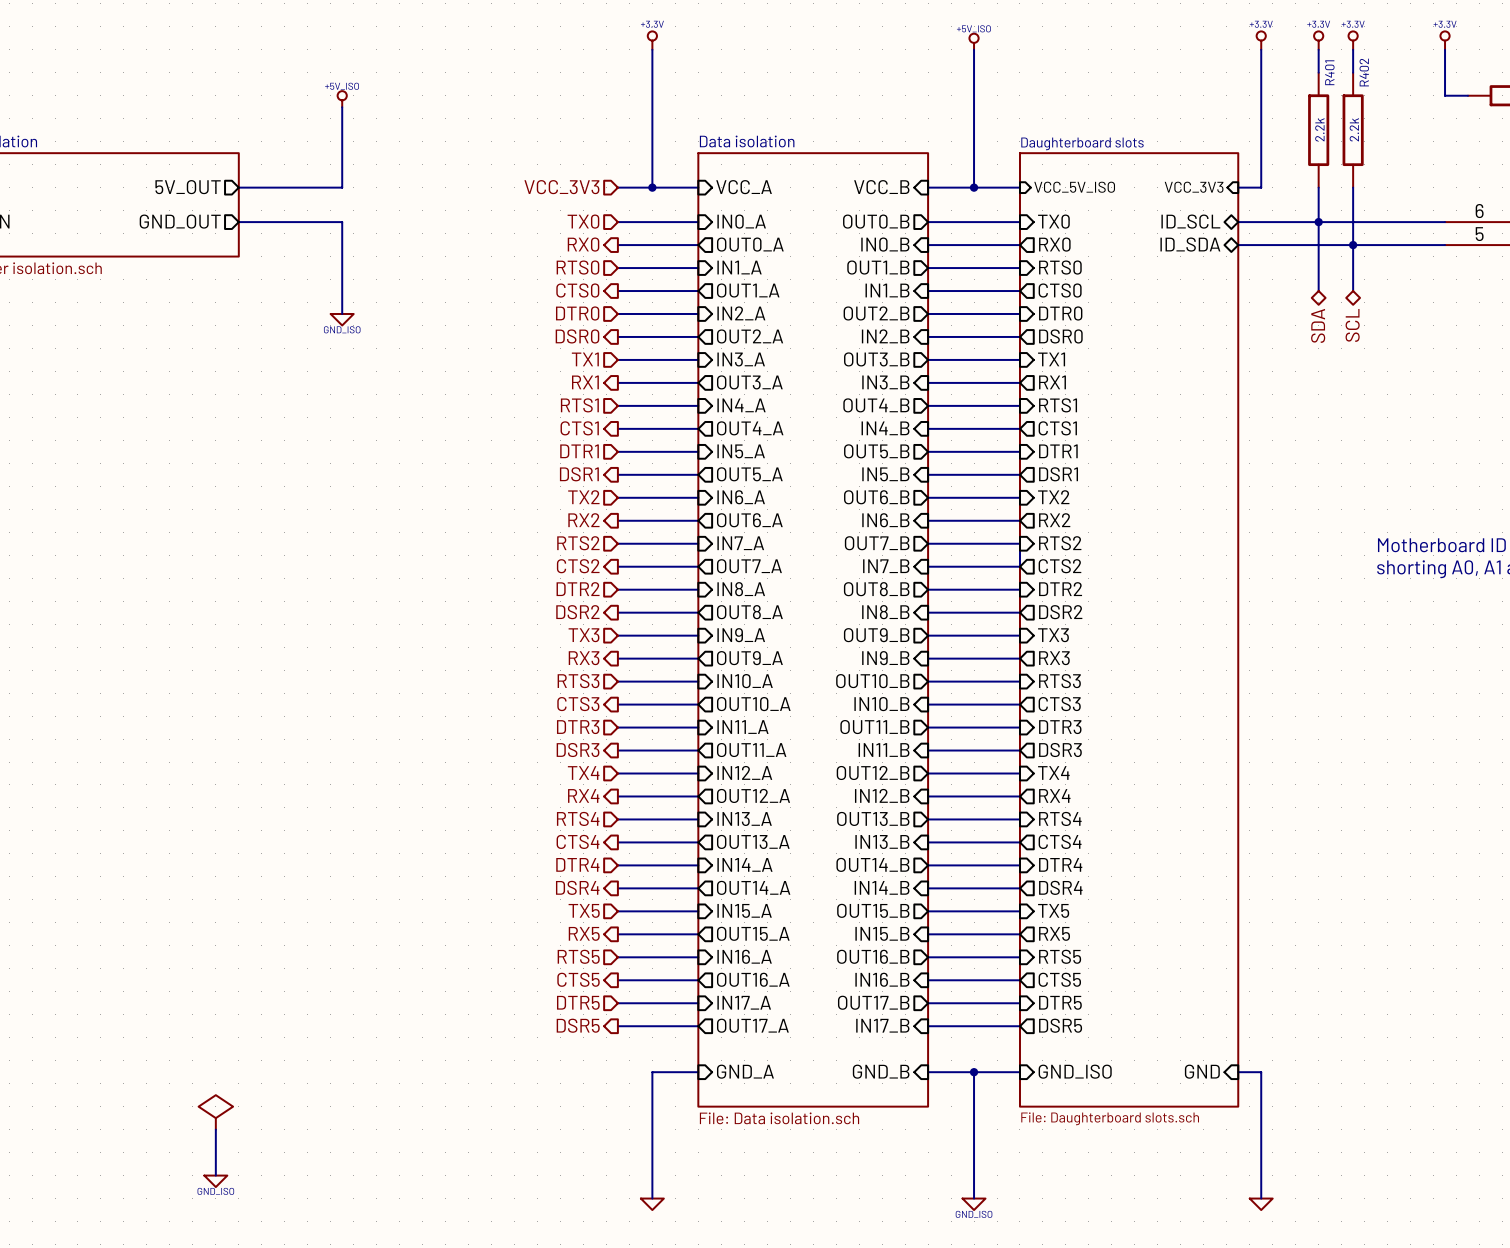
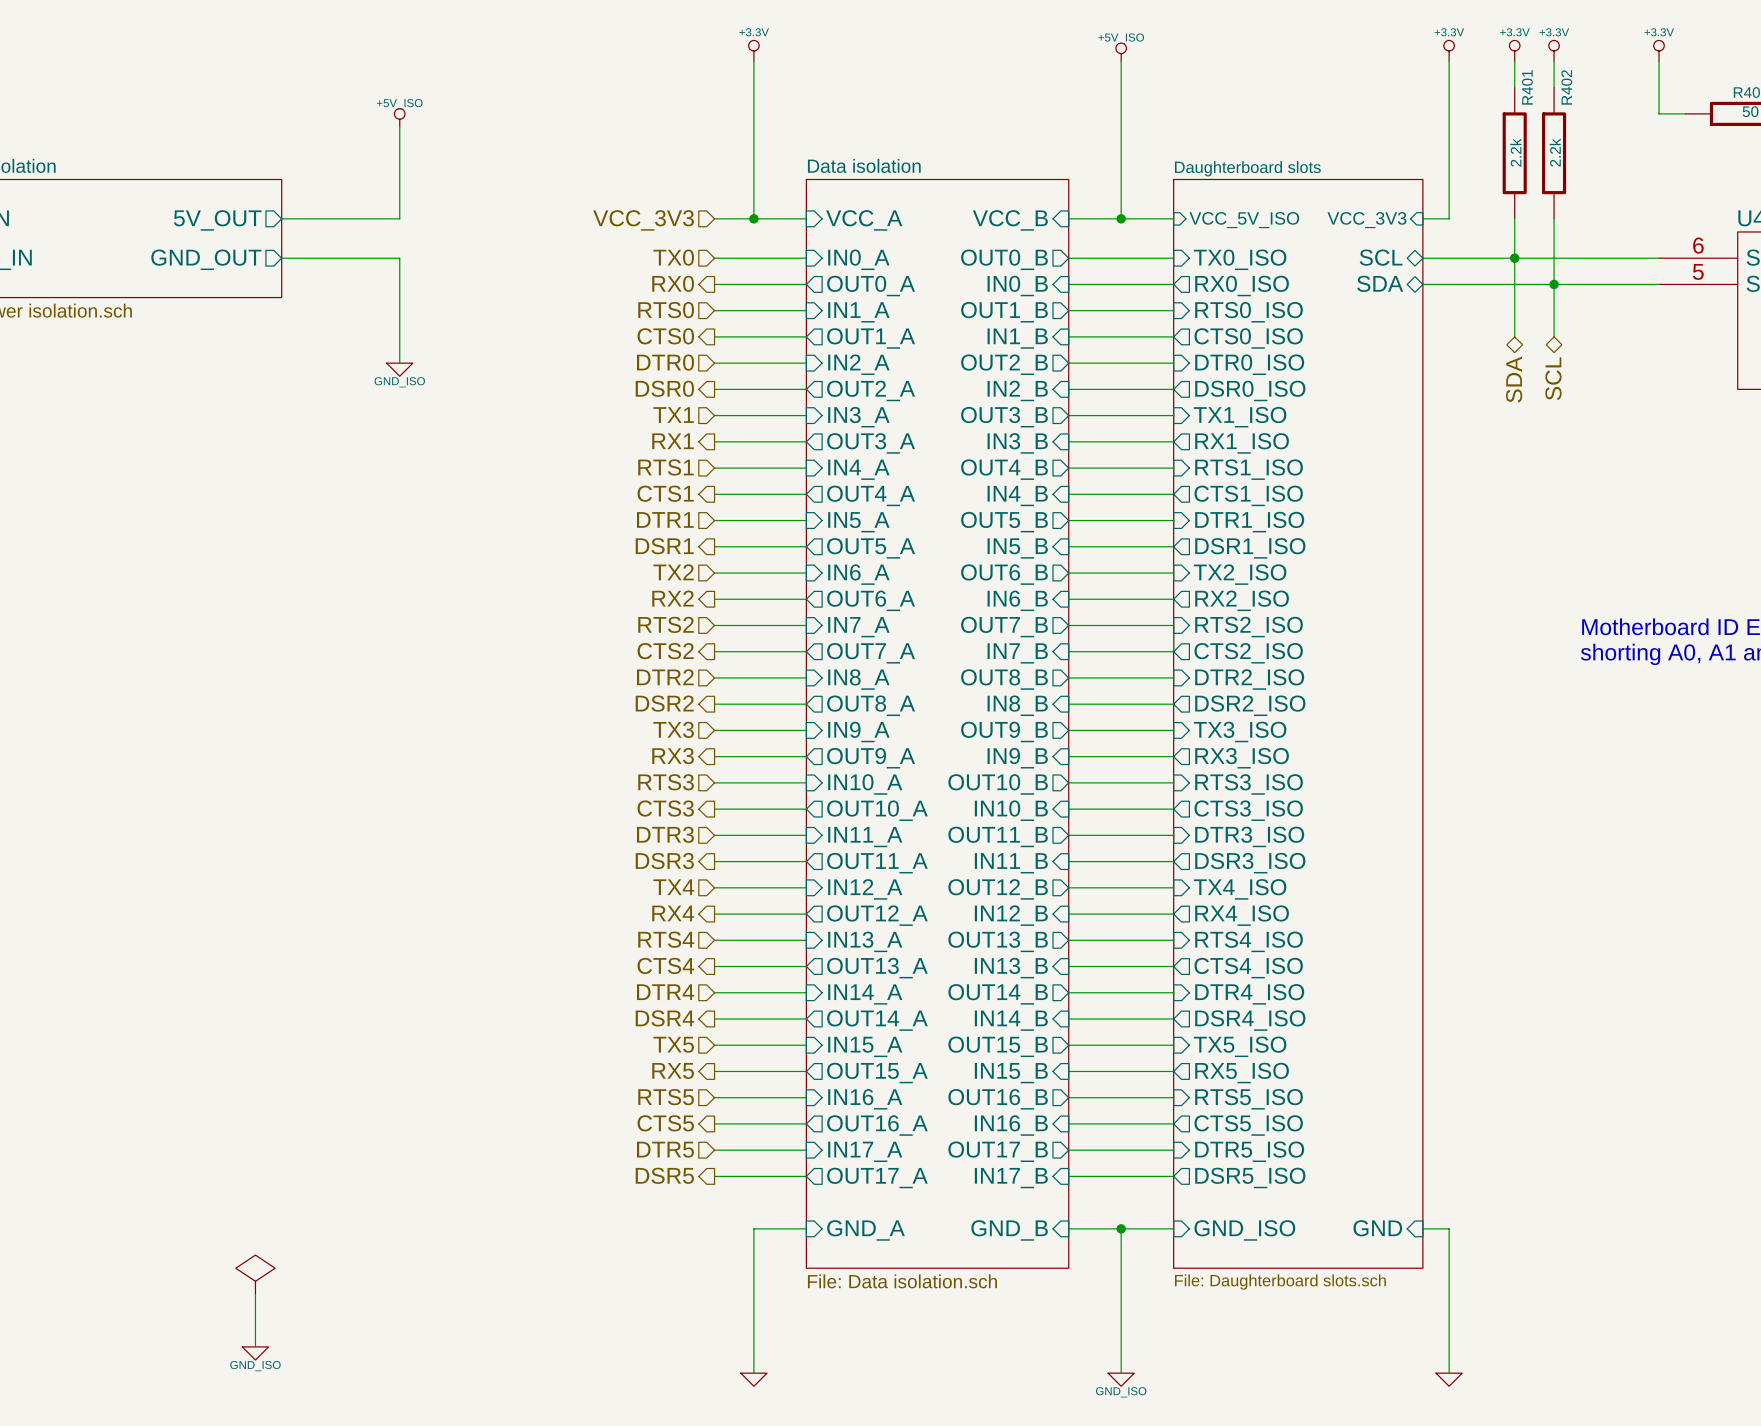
sheet pin: TX0 (1053, 221) -> TX0_ISO (1240, 259)
sheet pin: ID_SCL (1190, 221) -> SCL (1381, 257)
sheet pin: RX0 (1054, 244) -> RX0_ISO (1242, 286)
sheet pin: ID_SDA (1190, 244) -> SDA (1380, 283)
sheet pin: RTS0 (1060, 267) -> RTS0_ISO (1249, 312)
sheet pin: CTS0 (1060, 290) -> CTS0_ISO (1248, 338)
sheet pin: DTR0 (1060, 313) -> DTR0_ISO (1249, 364)
sheet pin: DSR0 (1060, 336) -> DSR0_ISO (1250, 390)
sheet pin: TX1 (1051, 359) -> TX1_ISO (1240, 417)
sheet pin: RX1 (1052, 382) -> RX1_ISO (1242, 443)
sheet pin: RTS1 (1058, 405) -> RTS1_ISO (1249, 469)
sheet pin: CTS1 (1057, 428) -> CTS1_ISO (1248, 495)
sheet pin: DTR1 (1058, 451) -> DTR1_ISO (1249, 522)
sheet pin: DSR1 (1058, 474) -> DSR1_ISO (1250, 548)
sheet pin: TX2 (1053, 497) -> TX2_ISO (1240, 574)
sheet pin: RX2 (1054, 520) -> RX2_ISO (1242, 600)
sheet pin: RTS2 (1060, 543) -> RTS2_ISO (1249, 627)
sheet pin: CTS2 (1059, 566) -> CTS2_ISO (1248, 653)
sheet pin: DTR2 (1060, 589) -> DTR2_ISO (1249, 679)
sheet pin: DSR2 (1060, 612) -> DSR2_ISO (1250, 705)
sheet pin: TX3 (1053, 635) -> TX3_ISO (1240, 731)
sheet pin: RX3 (1054, 658) -> RX3_ISO (1242, 758)
sheet pin: RTS3 (1059, 681) -> RTS3_ISO (1249, 784)
sheet pin: CTS3 (1059, 704) -> CTS3_ISO (1248, 810)
sheet pin: DTR3 (1060, 727) -> DTR3_ISO (1249, 836)
sheet pin: DSR3 (1060, 750) -> DSR3_ISO (1250, 863)
sheet pin: TX4 (1053, 772) -> TX4_ISO (1240, 889)
sheet pin: RX4 (1054, 795) -> RX4_ISO (1242, 915)
sheet pin: RTS4 (1060, 818) -> RTS4_ISO (1249, 941)
sheet pin: CTS4 (1060, 841) -> CTS4_ISO (1248, 968)
sheet pin: DTR4 (1060, 864) -> DTR4_ISO (1249, 994)
sheet pin: DSR4 (1060, 887) -> DSR4_ISO (1250, 1020)
sheet pin: TX5 (1053, 910) -> TX5_ISO (1240, 1046)
sheet pin: RX5 (1054, 933) -> RX5_ISO (1242, 1073)
sheet pin: RTS5 (1060, 956) -> RTS5_ISO (1249, 1099)
sheet pin: CTS5 (1059, 979) -> CTS5_ISO (1248, 1125)
sheet pin: DTR5 (1060, 1002) -> DTR5_ISO (1249, 1151)
sheet pin: DSR5 (1060, 1025) -> DSR5_ISO (1250, 1177)

